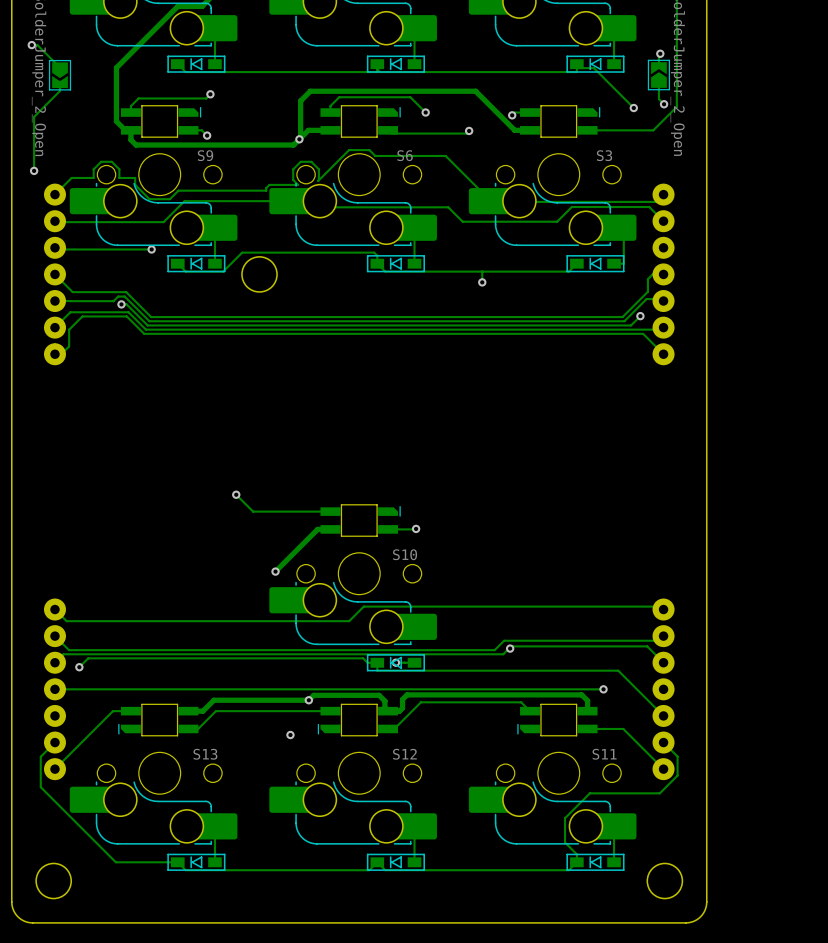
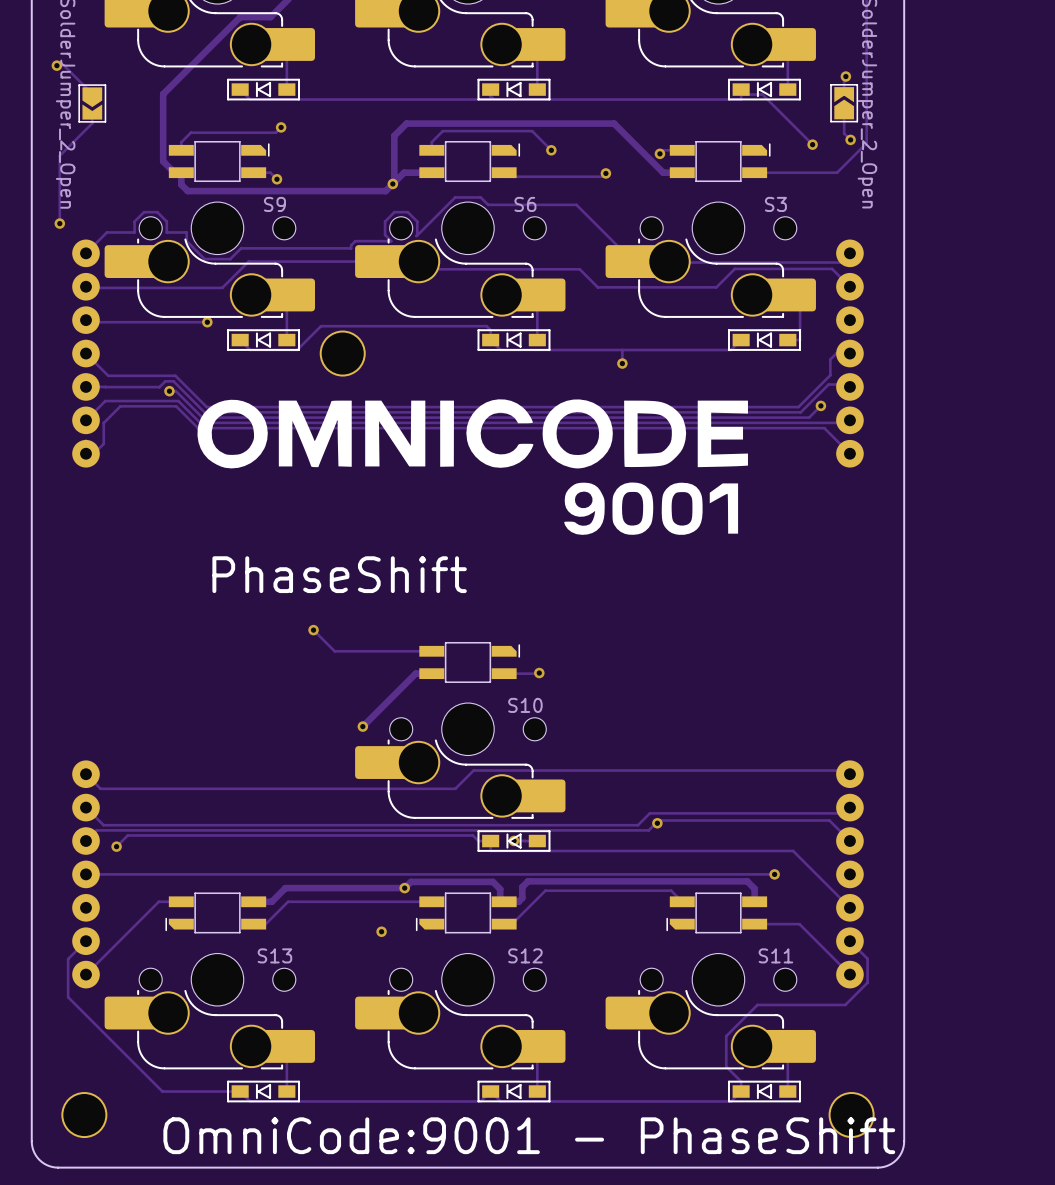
drawing: none -> [197, 399, 748, 535]
text: none -> PhaseShift (339, 574)
text: none -> OmniCode:9001 - PhaseShift (529, 1135)

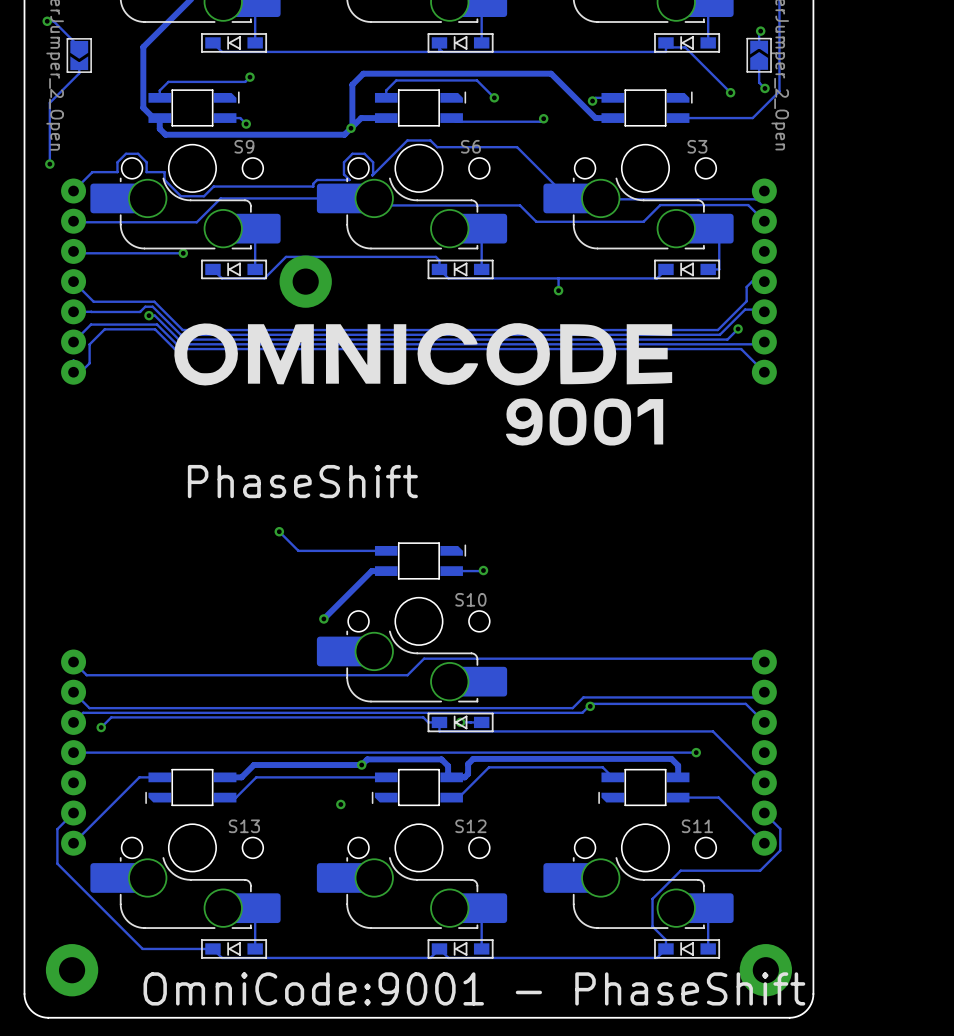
part footprint: [319, 330, 366, 377] -> [279, 255, 332, 308]
part footprint: [61, 1092, 108, 1139] -> [45, 944, 99, 997]
part footprint: [828, 1092, 875, 1139] -> [739, 944, 793, 997]

